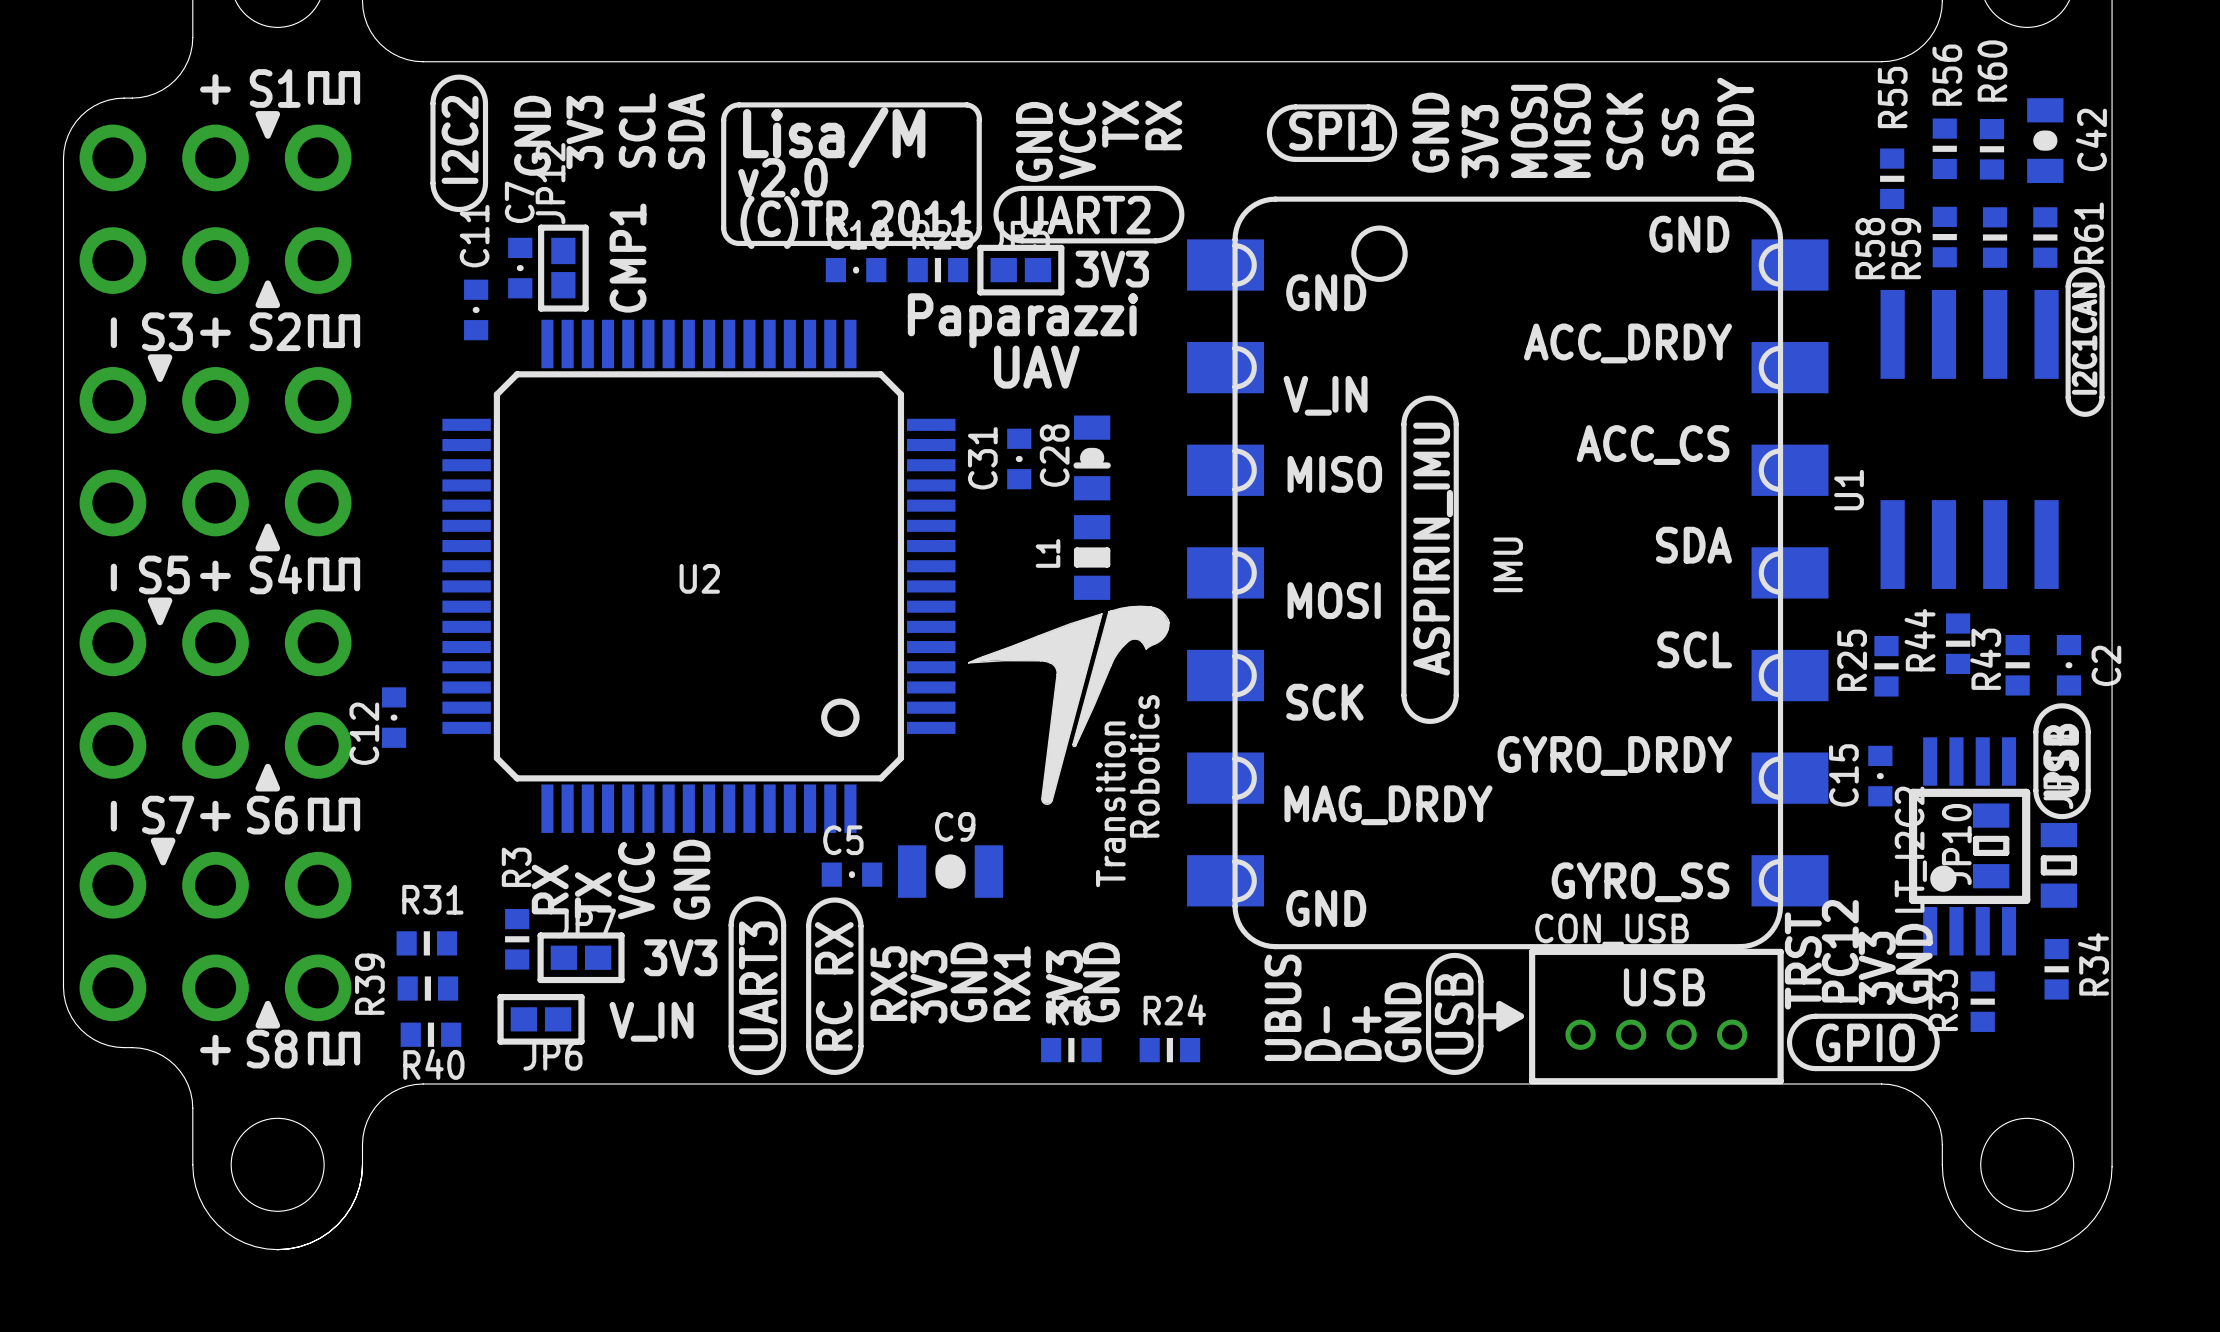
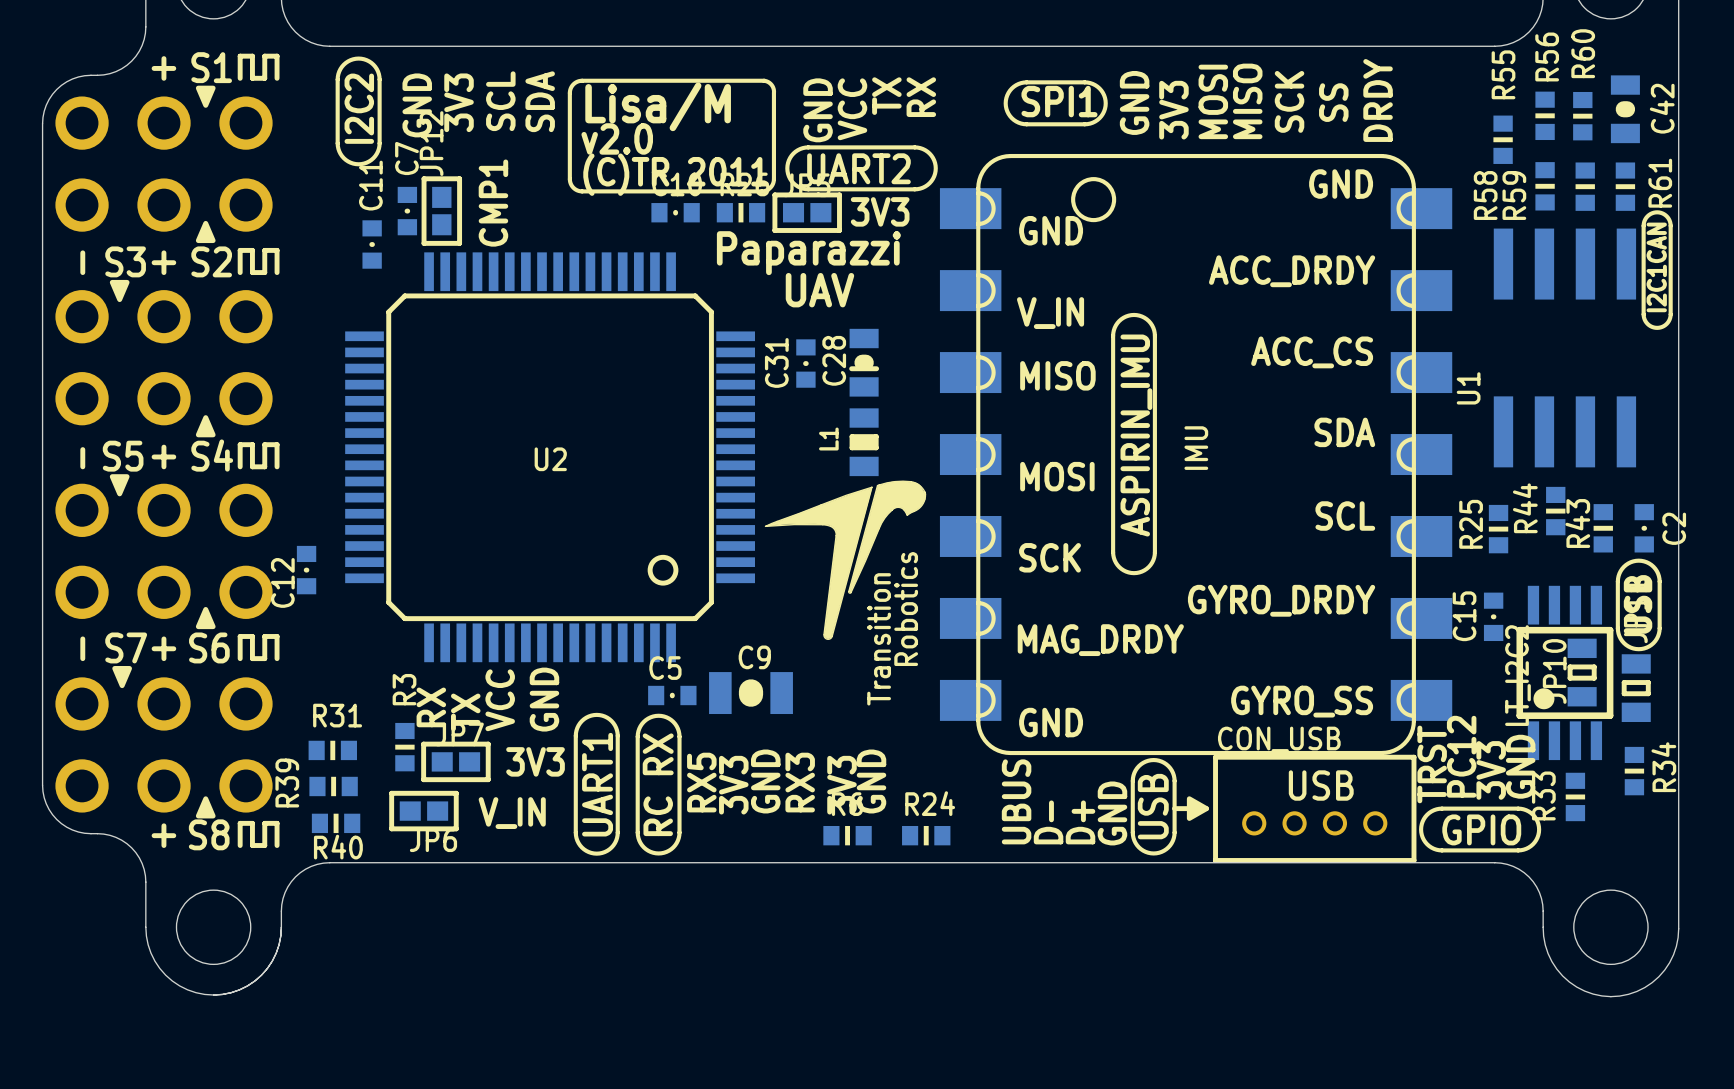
text: RX1 (1012, 983) -> RX3 (800, 782)
text: UART3 (758, 986) -> UART1 (597, 784)

